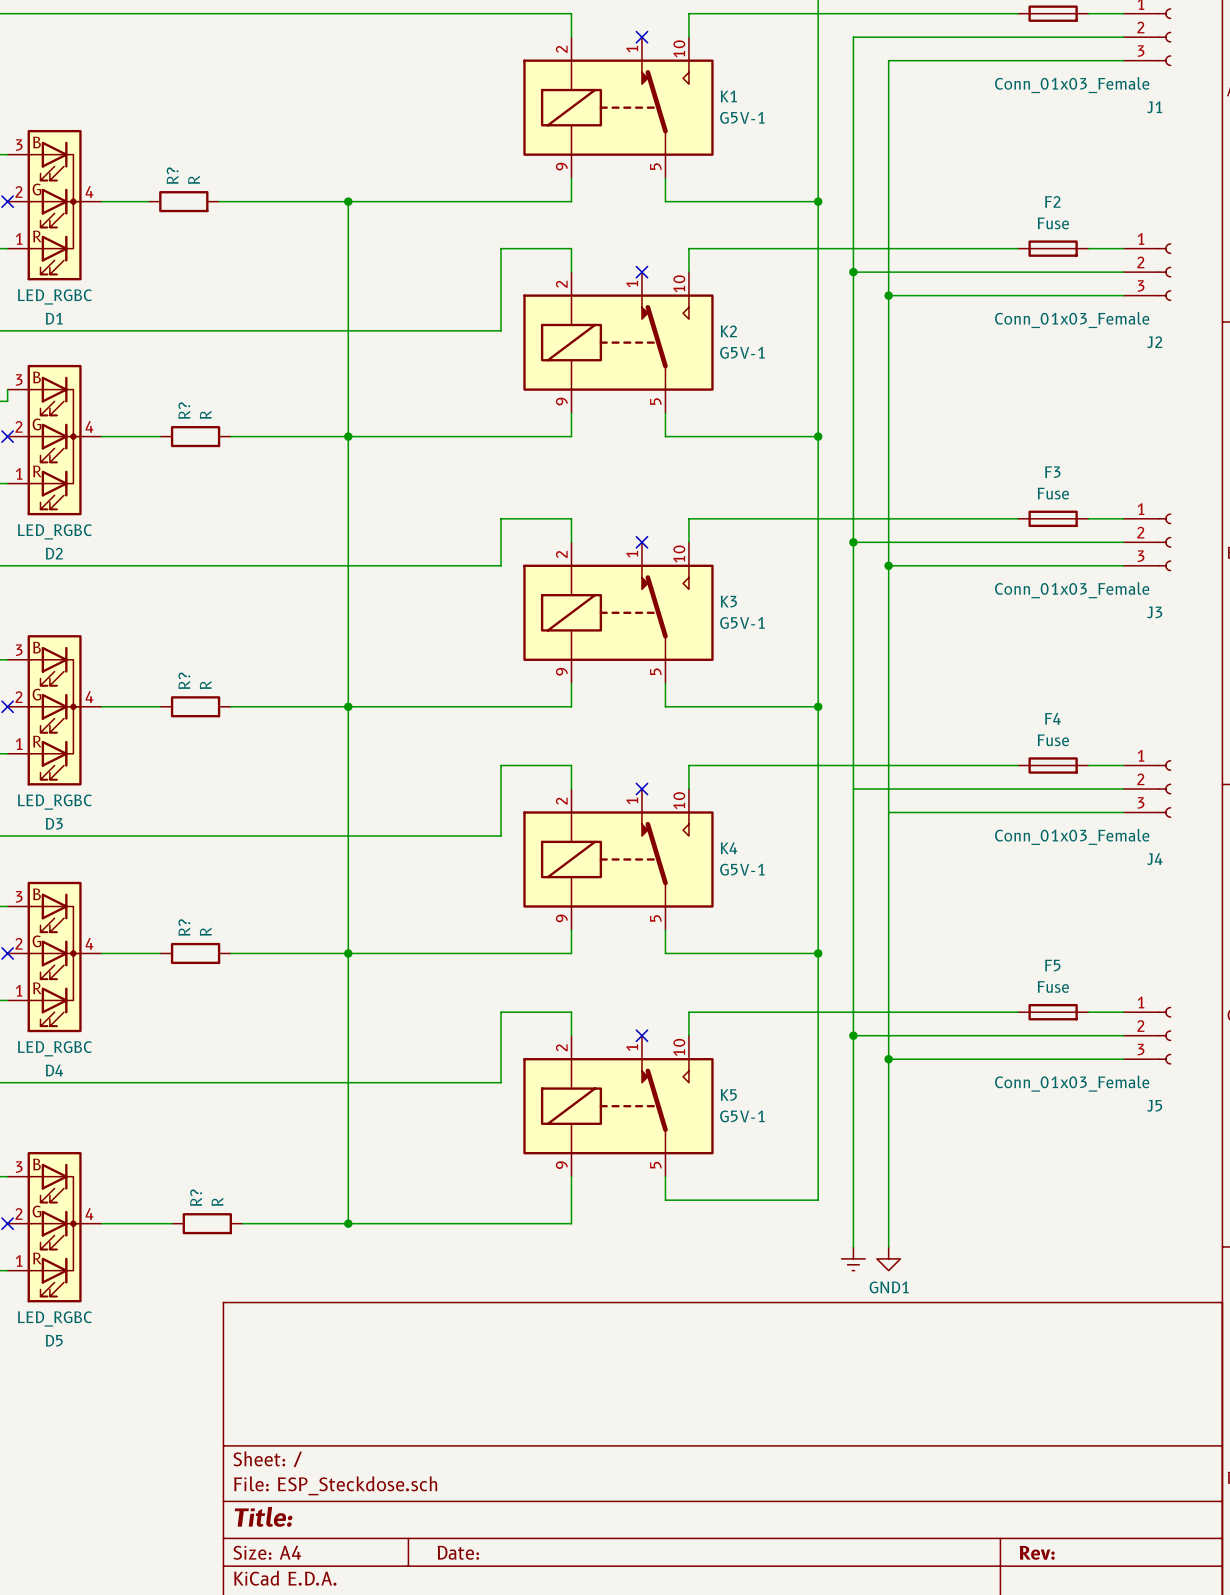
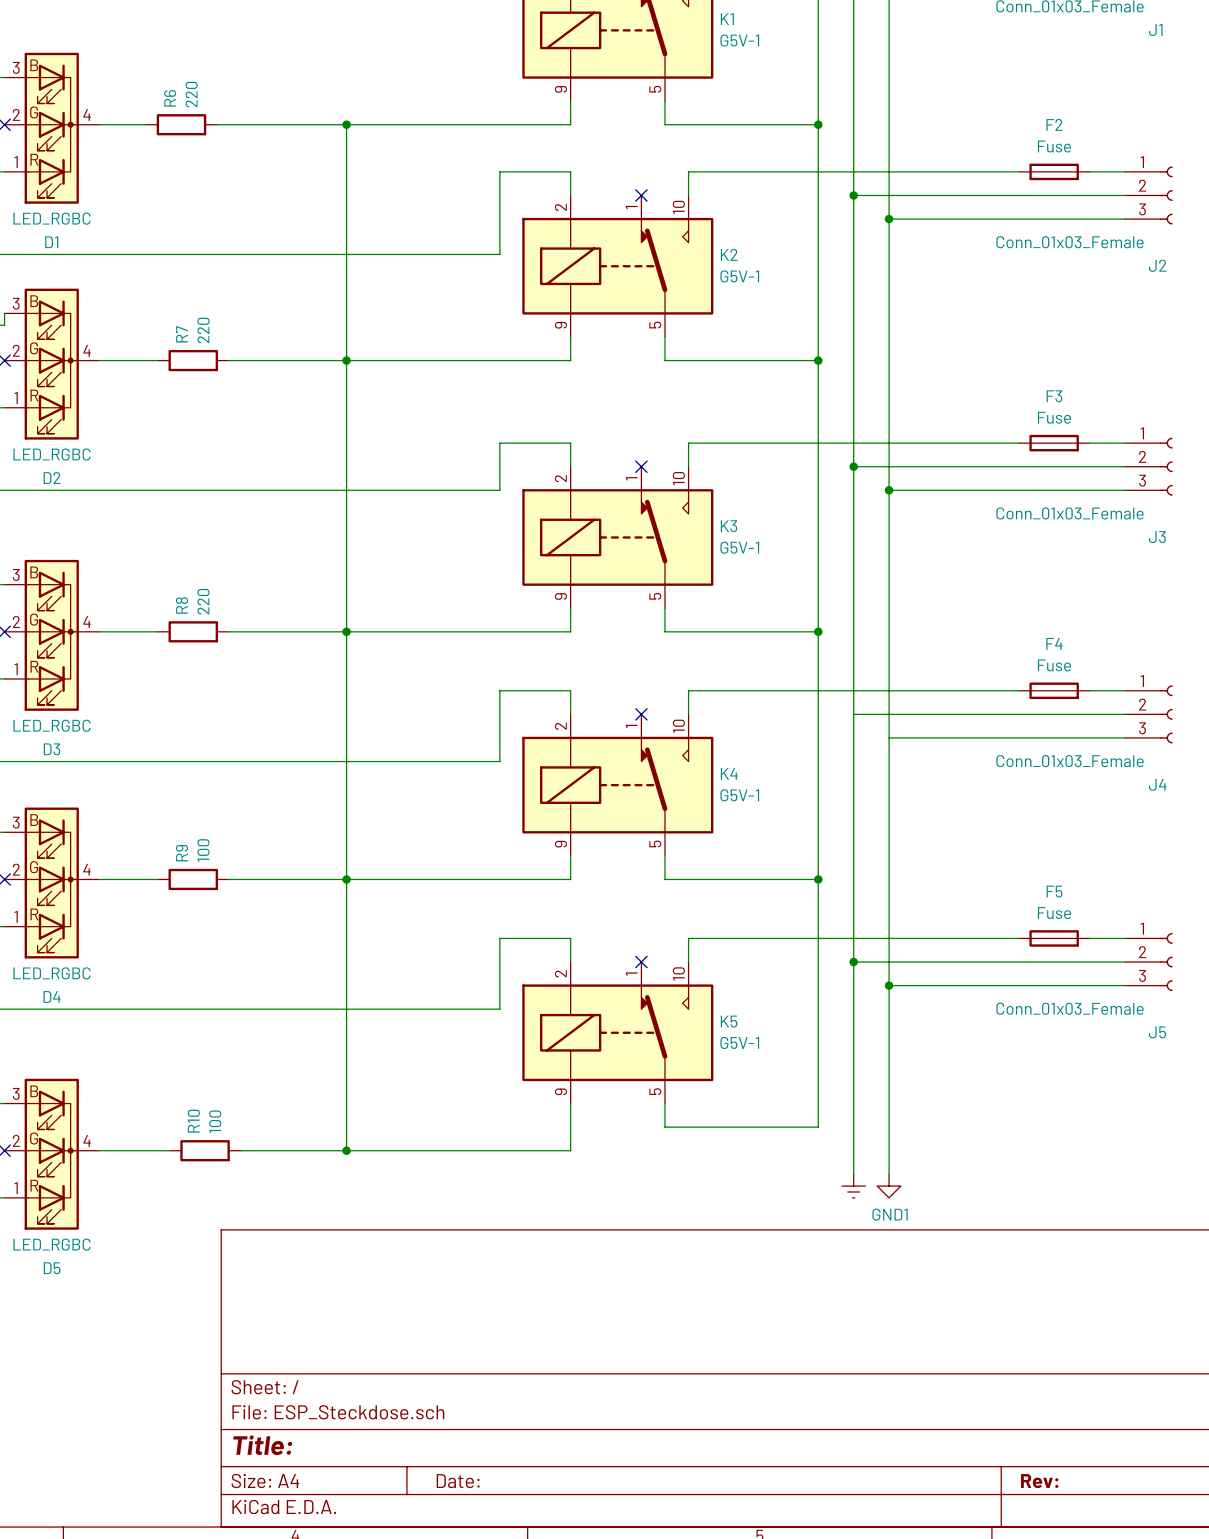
R? name: R? (172, 175) -> R6 (170, 98)
R? value: R (193, 179) -> 220 (191, 94)
R? name: R? (184, 410) -> R7 (181, 334)
R? value: R (205, 414) -> 220 (203, 330)
R? name: R? (184, 680) -> R8 (181, 605)
R? value: R (205, 684) -> 220 (203, 601)
R? name: R? (184, 927) -> R9 (181, 853)
R? value: R (205, 931) -> 100 (203, 850)
R? name: R? (196, 1197) -> R10 (193, 1121)
R? value: R (217, 1201) -> 100 (215, 1121)

